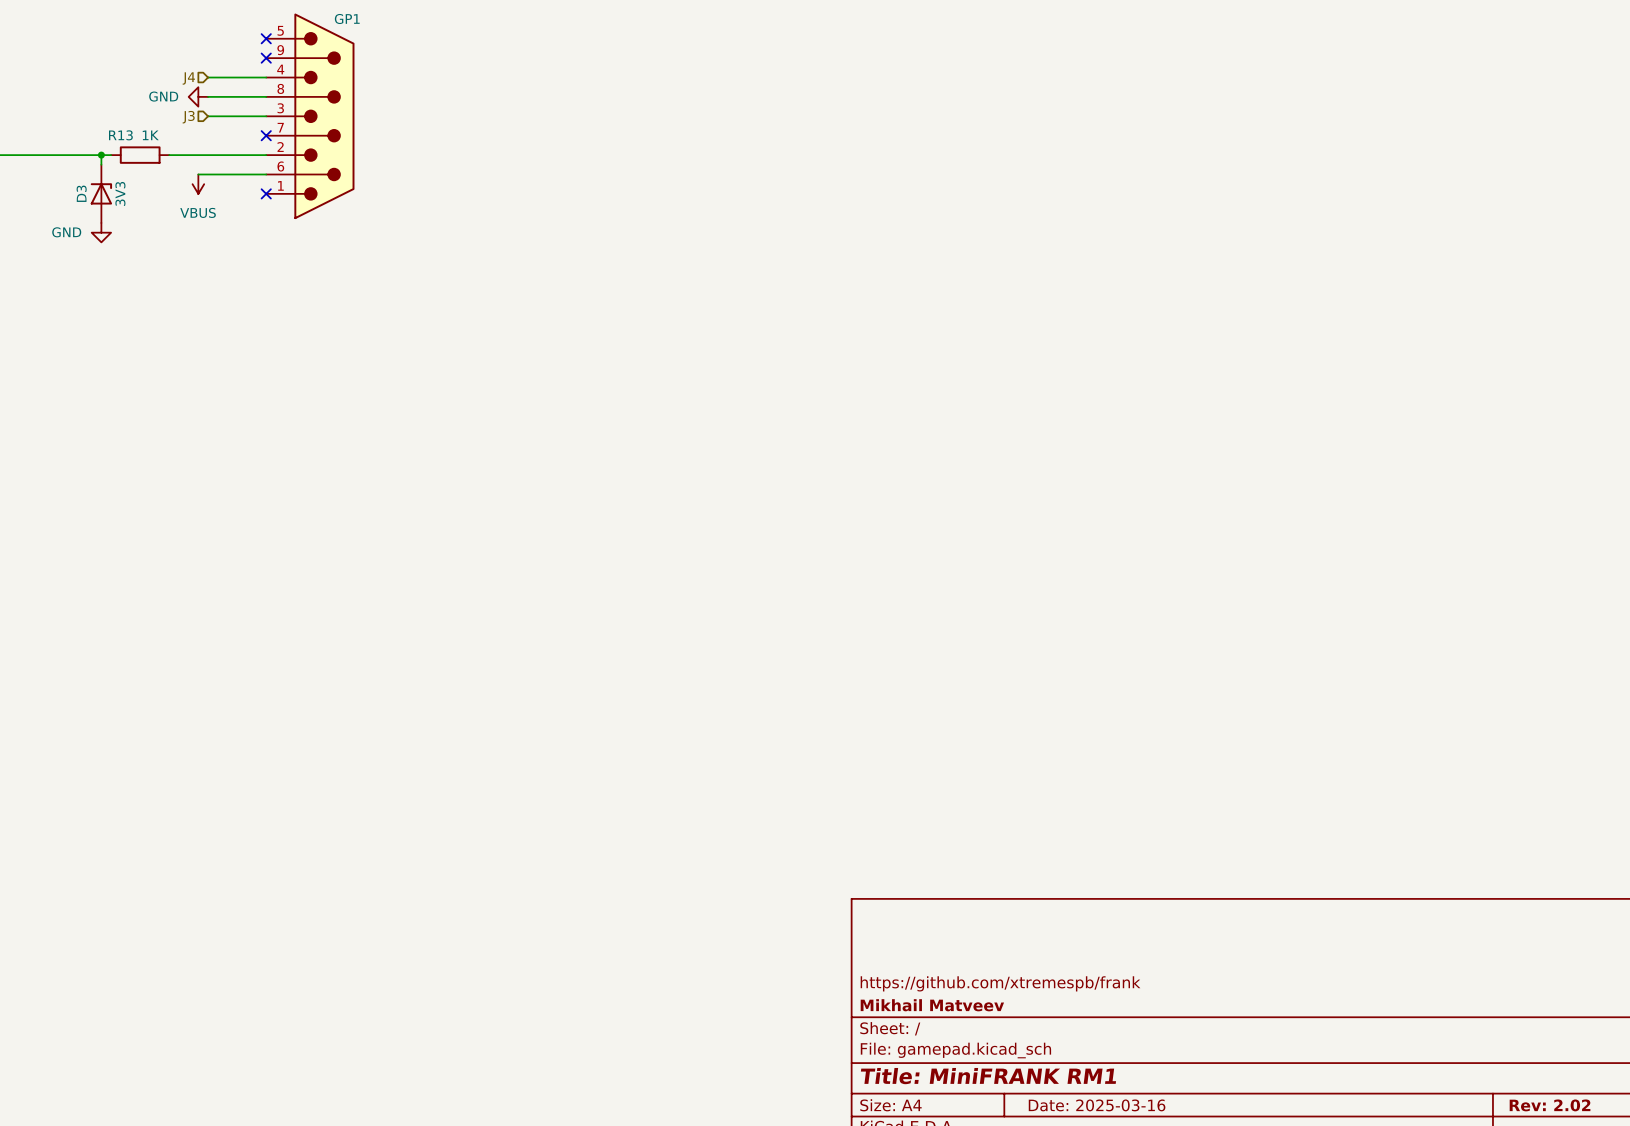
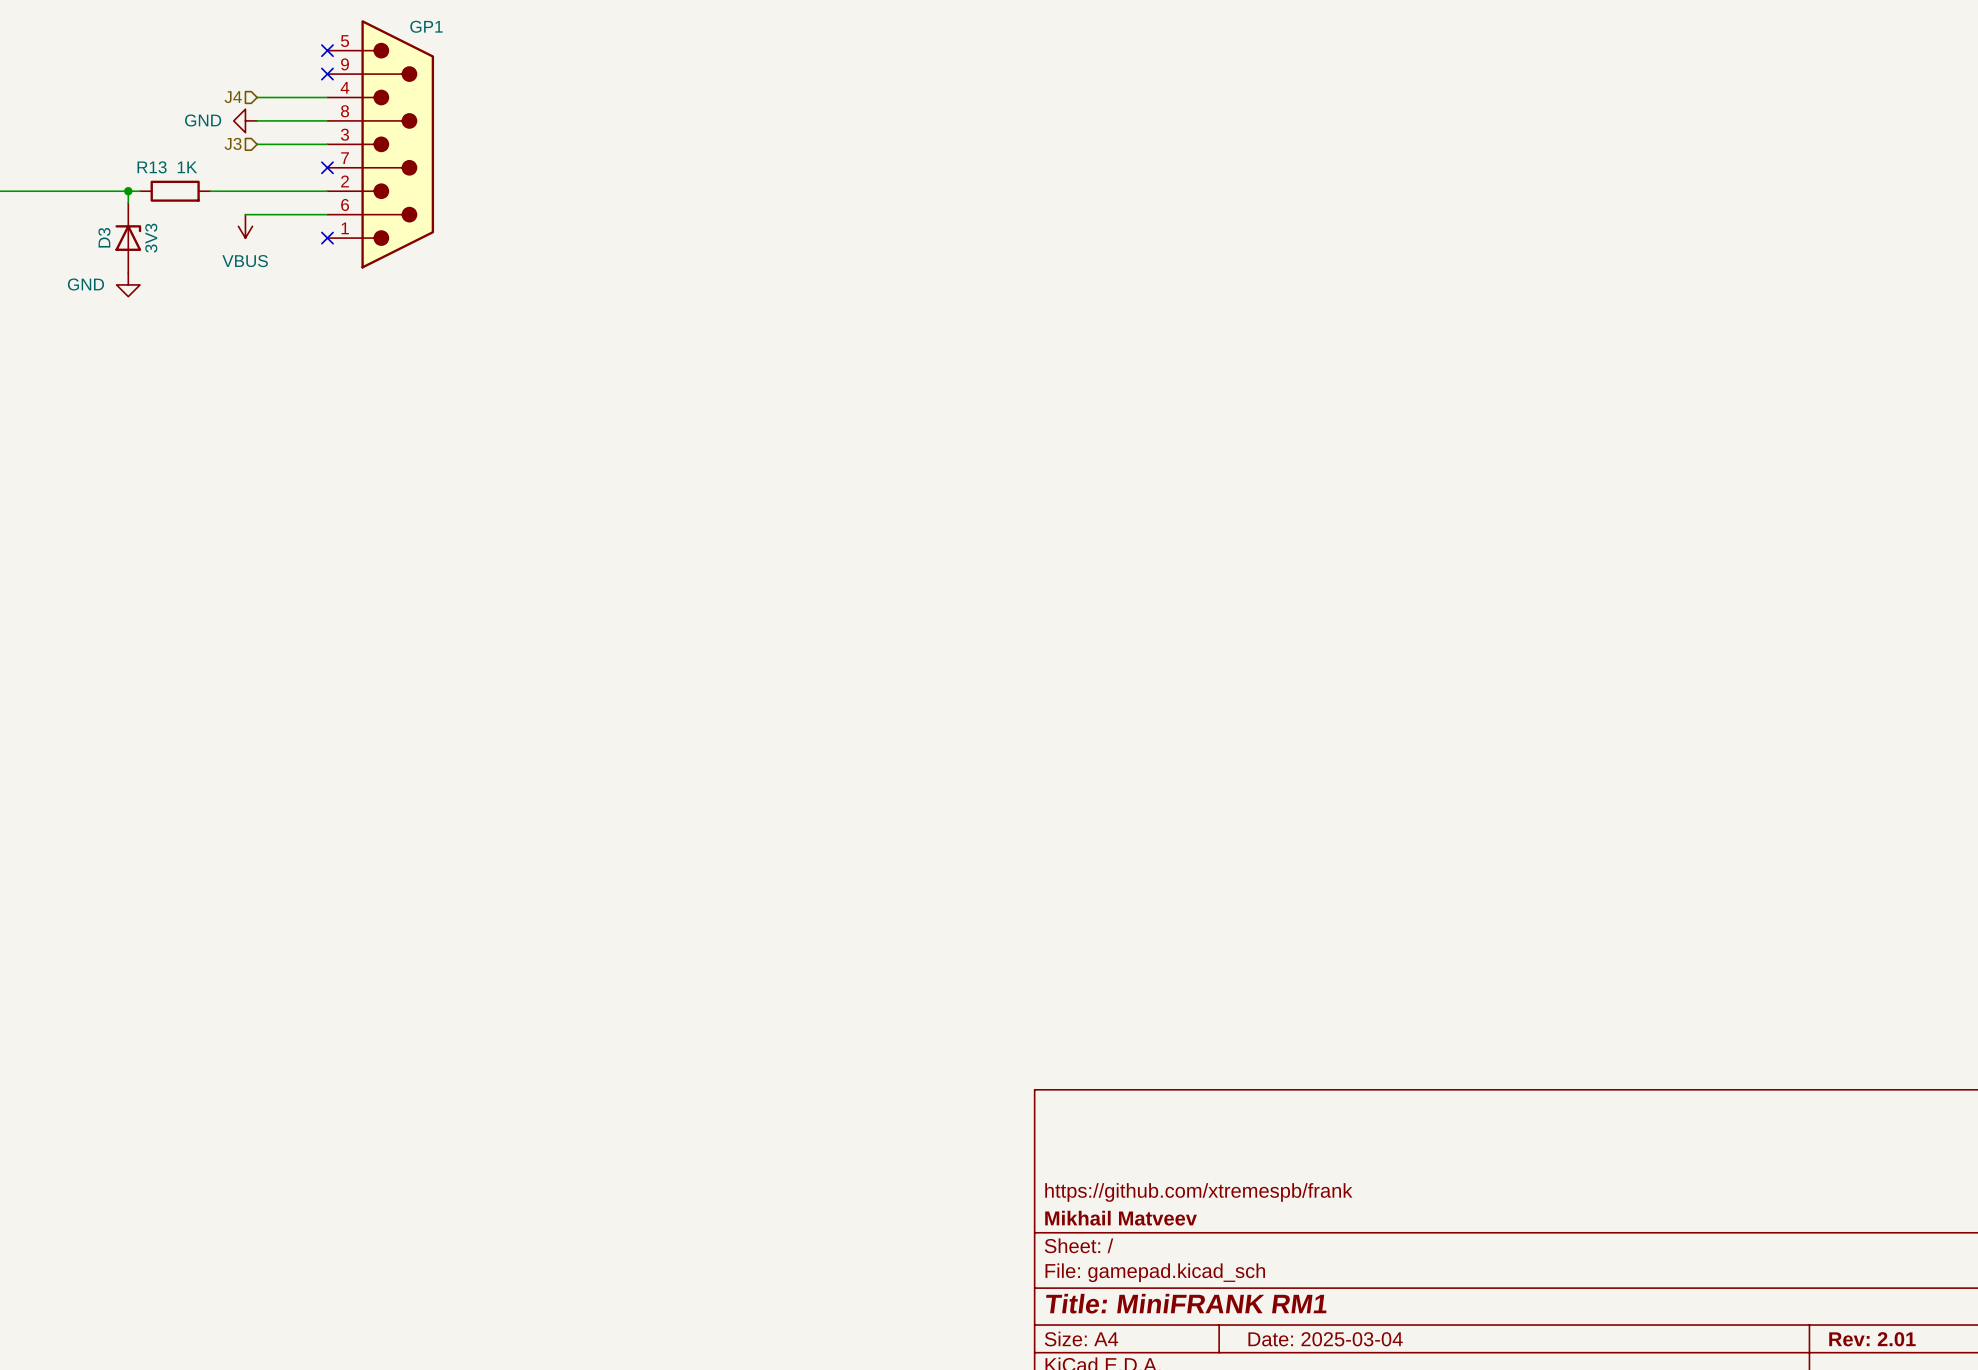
title block: Date: 2025-03-16 (1097, 1105) -> Date: 2025-03-04 (1325, 1339)
title block: Rev: 2.02 (1550, 1105) -> Rev: 2.01 (1872, 1339)

